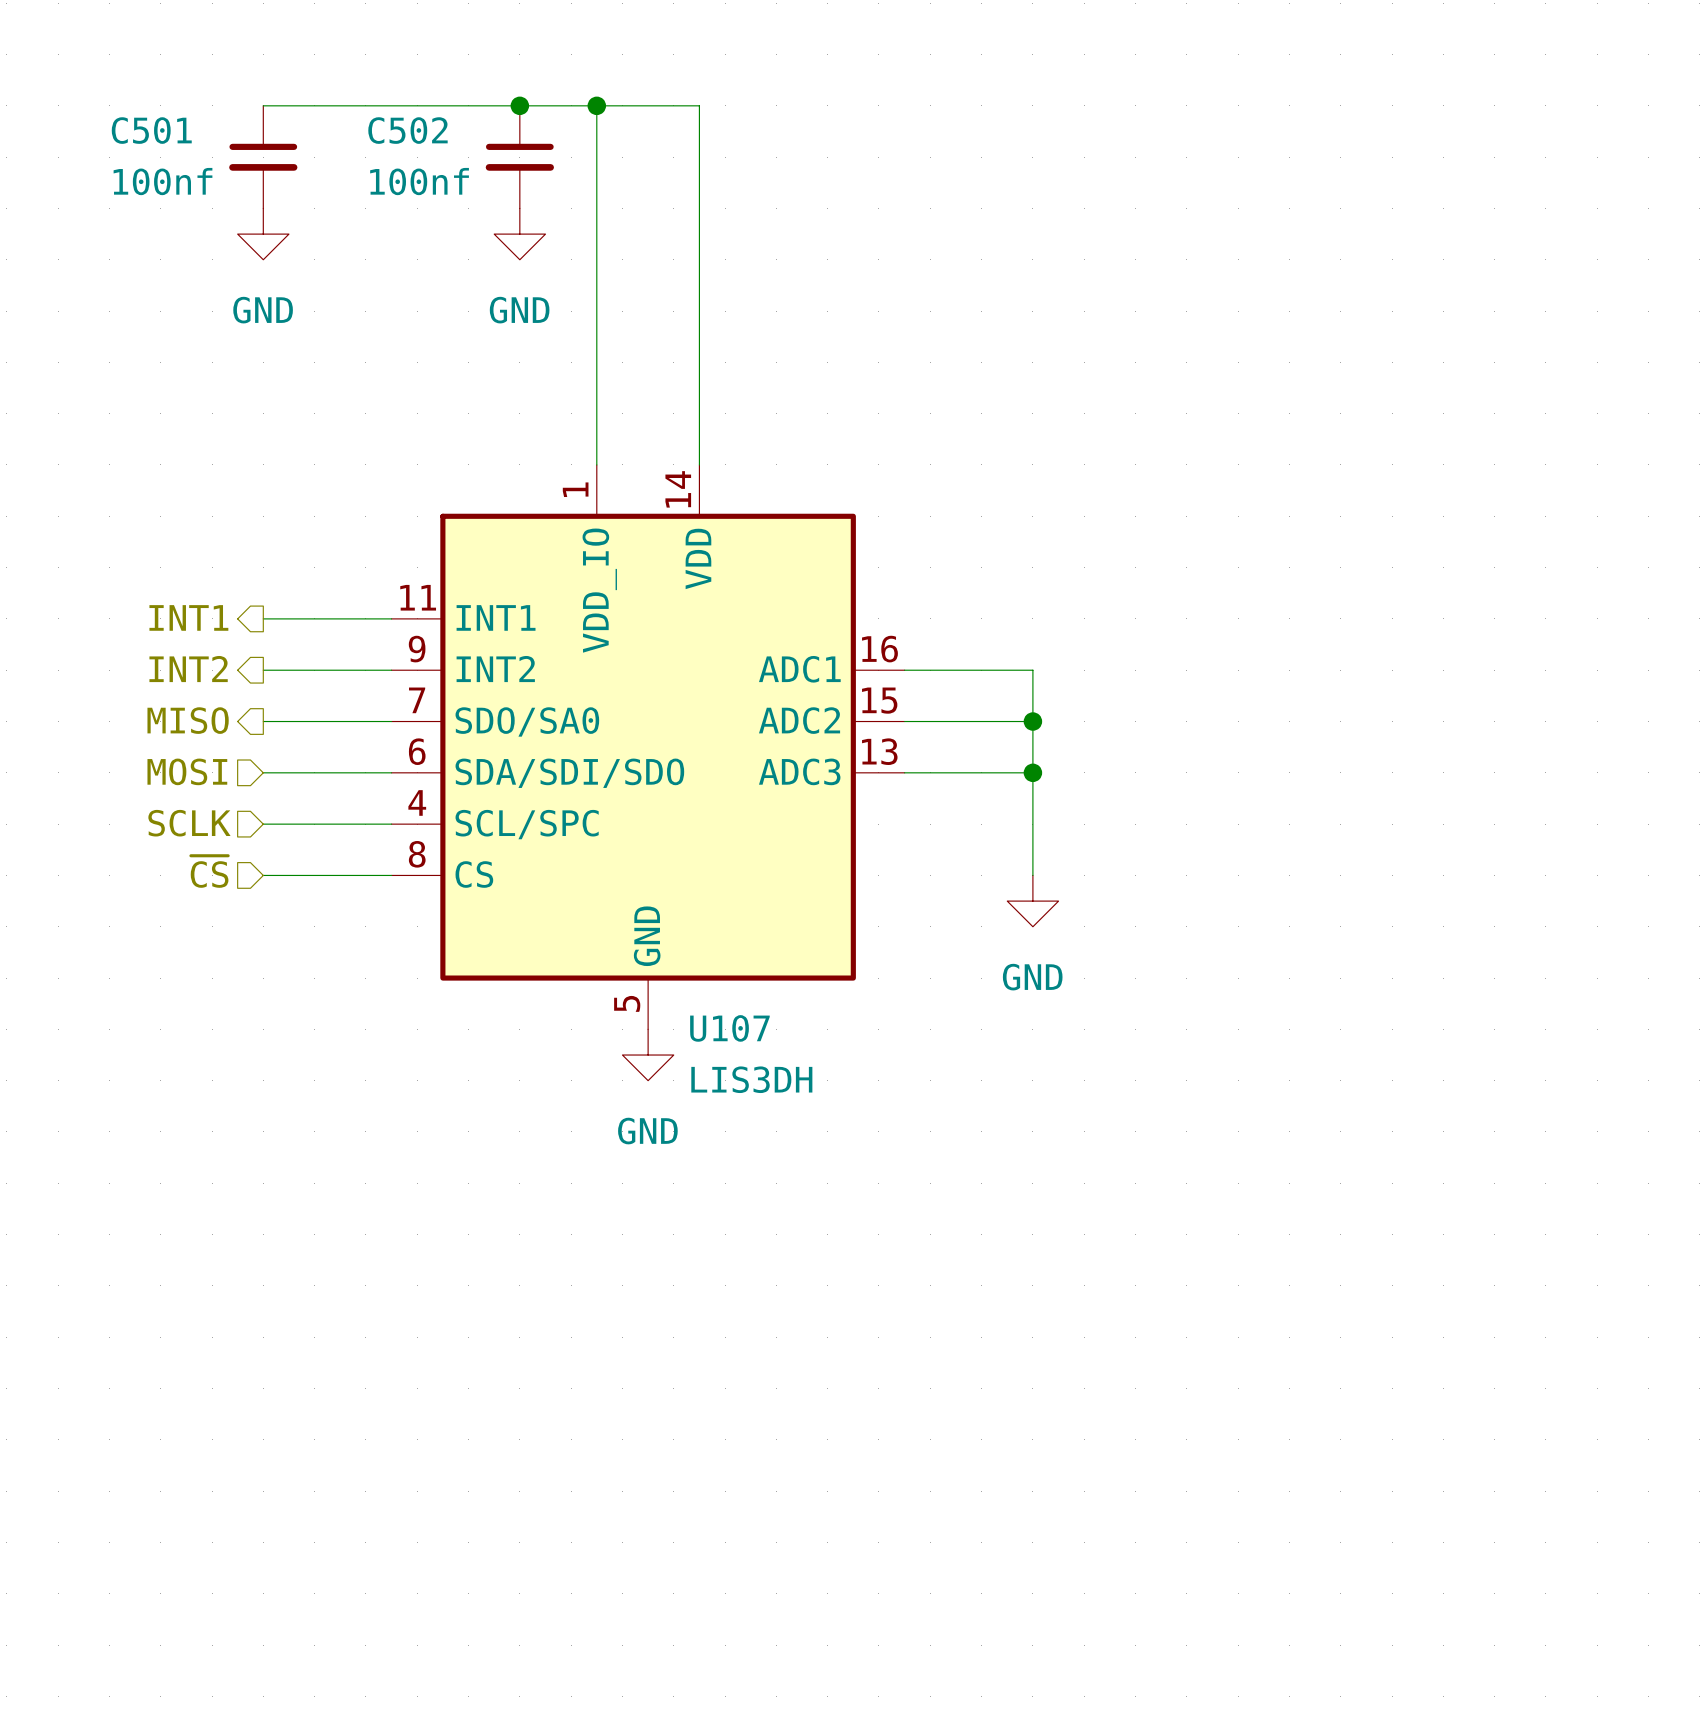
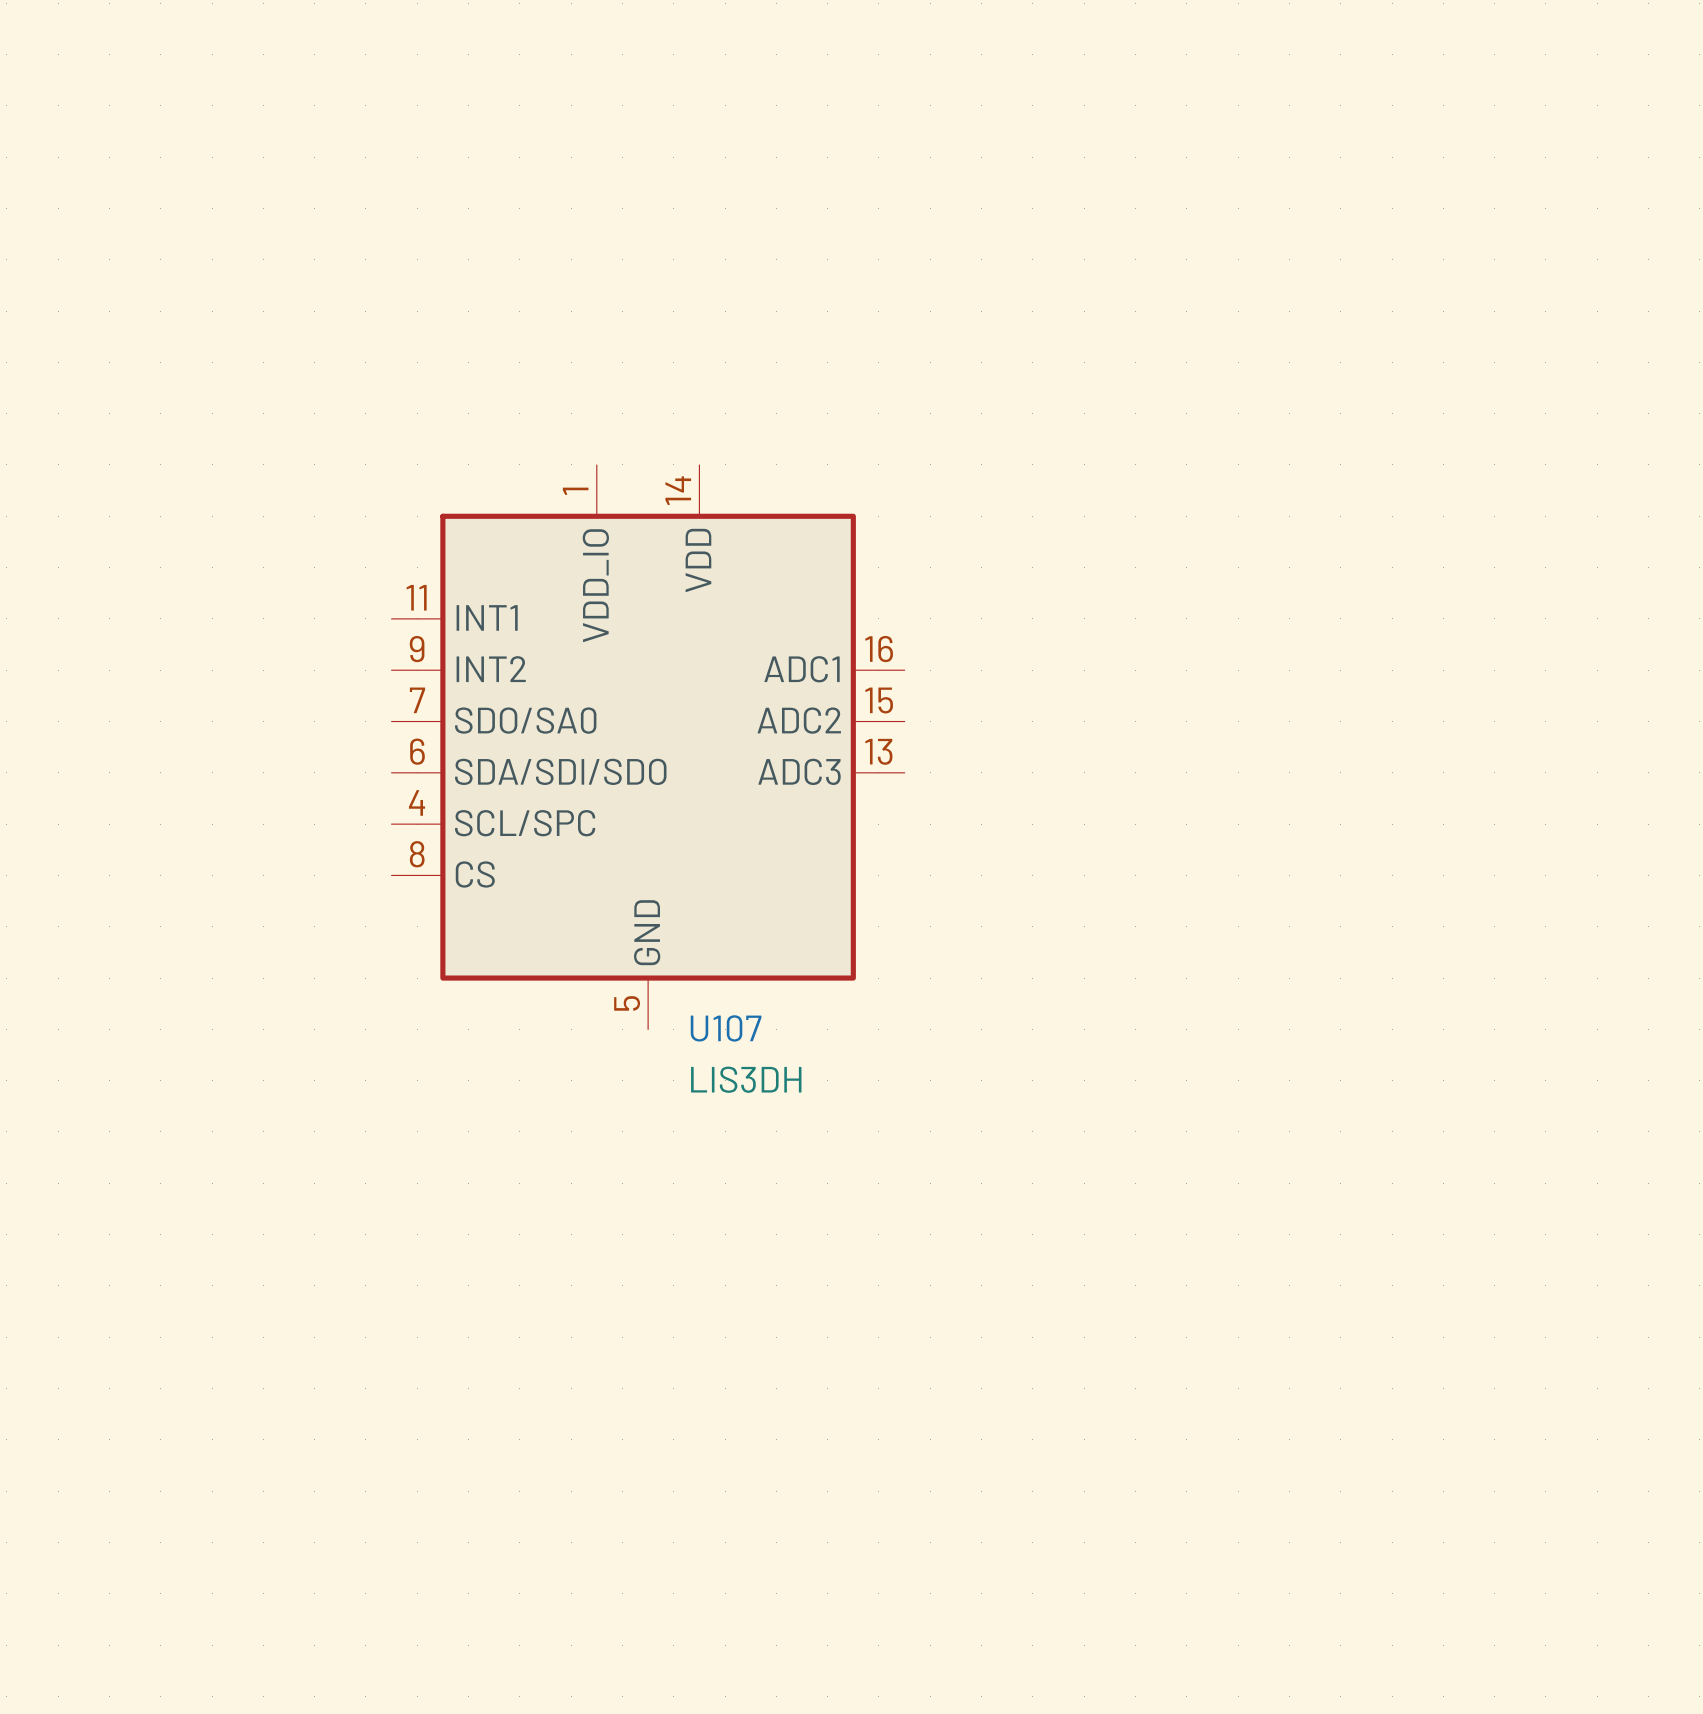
wire: (263, 105) (699, 105) (699, 464) -> none
junction: (519, 105) -> none
wire: (596, 105) (596, 464) -> none
junction: (596, 105) -> none
C501: (263, 157) -> none
C502: (519, 157) -> none
power symbol: GND (263, 234) -> none
power symbol: GND (519, 234) -> none
hierarchical label: INT1 (188, 617) -> none
wire: (263, 618) (391, 618) -> none
hierarchical label: INT2 (188, 669) -> none
wire: (263, 670) (391, 670) -> none
wire: (904, 670) (1032, 670) (1032, 875) -> none
hierarchical label: MISO (188, 720) -> none
wire: (263, 721) (391, 721) -> none
wire: (904, 721) (1032, 721) -> none
junction: (1032, 721) -> none
hierarchical label: MOSI (187, 771) -> none
wire: (263, 772) (391, 772) -> none
wire: (904, 772) (1032, 772) -> none
junction: (1032, 772) -> none
hierarchical label: SCLK (189, 823) -> none
wire: (263, 824) (391, 824) -> none
hierarchical label: ~{CS} (209, 871) -> none
wire: (263, 875) (391, 875) -> none
power symbol: GND (1032, 901) -> none
power symbol: GND (648, 1055) -> none

